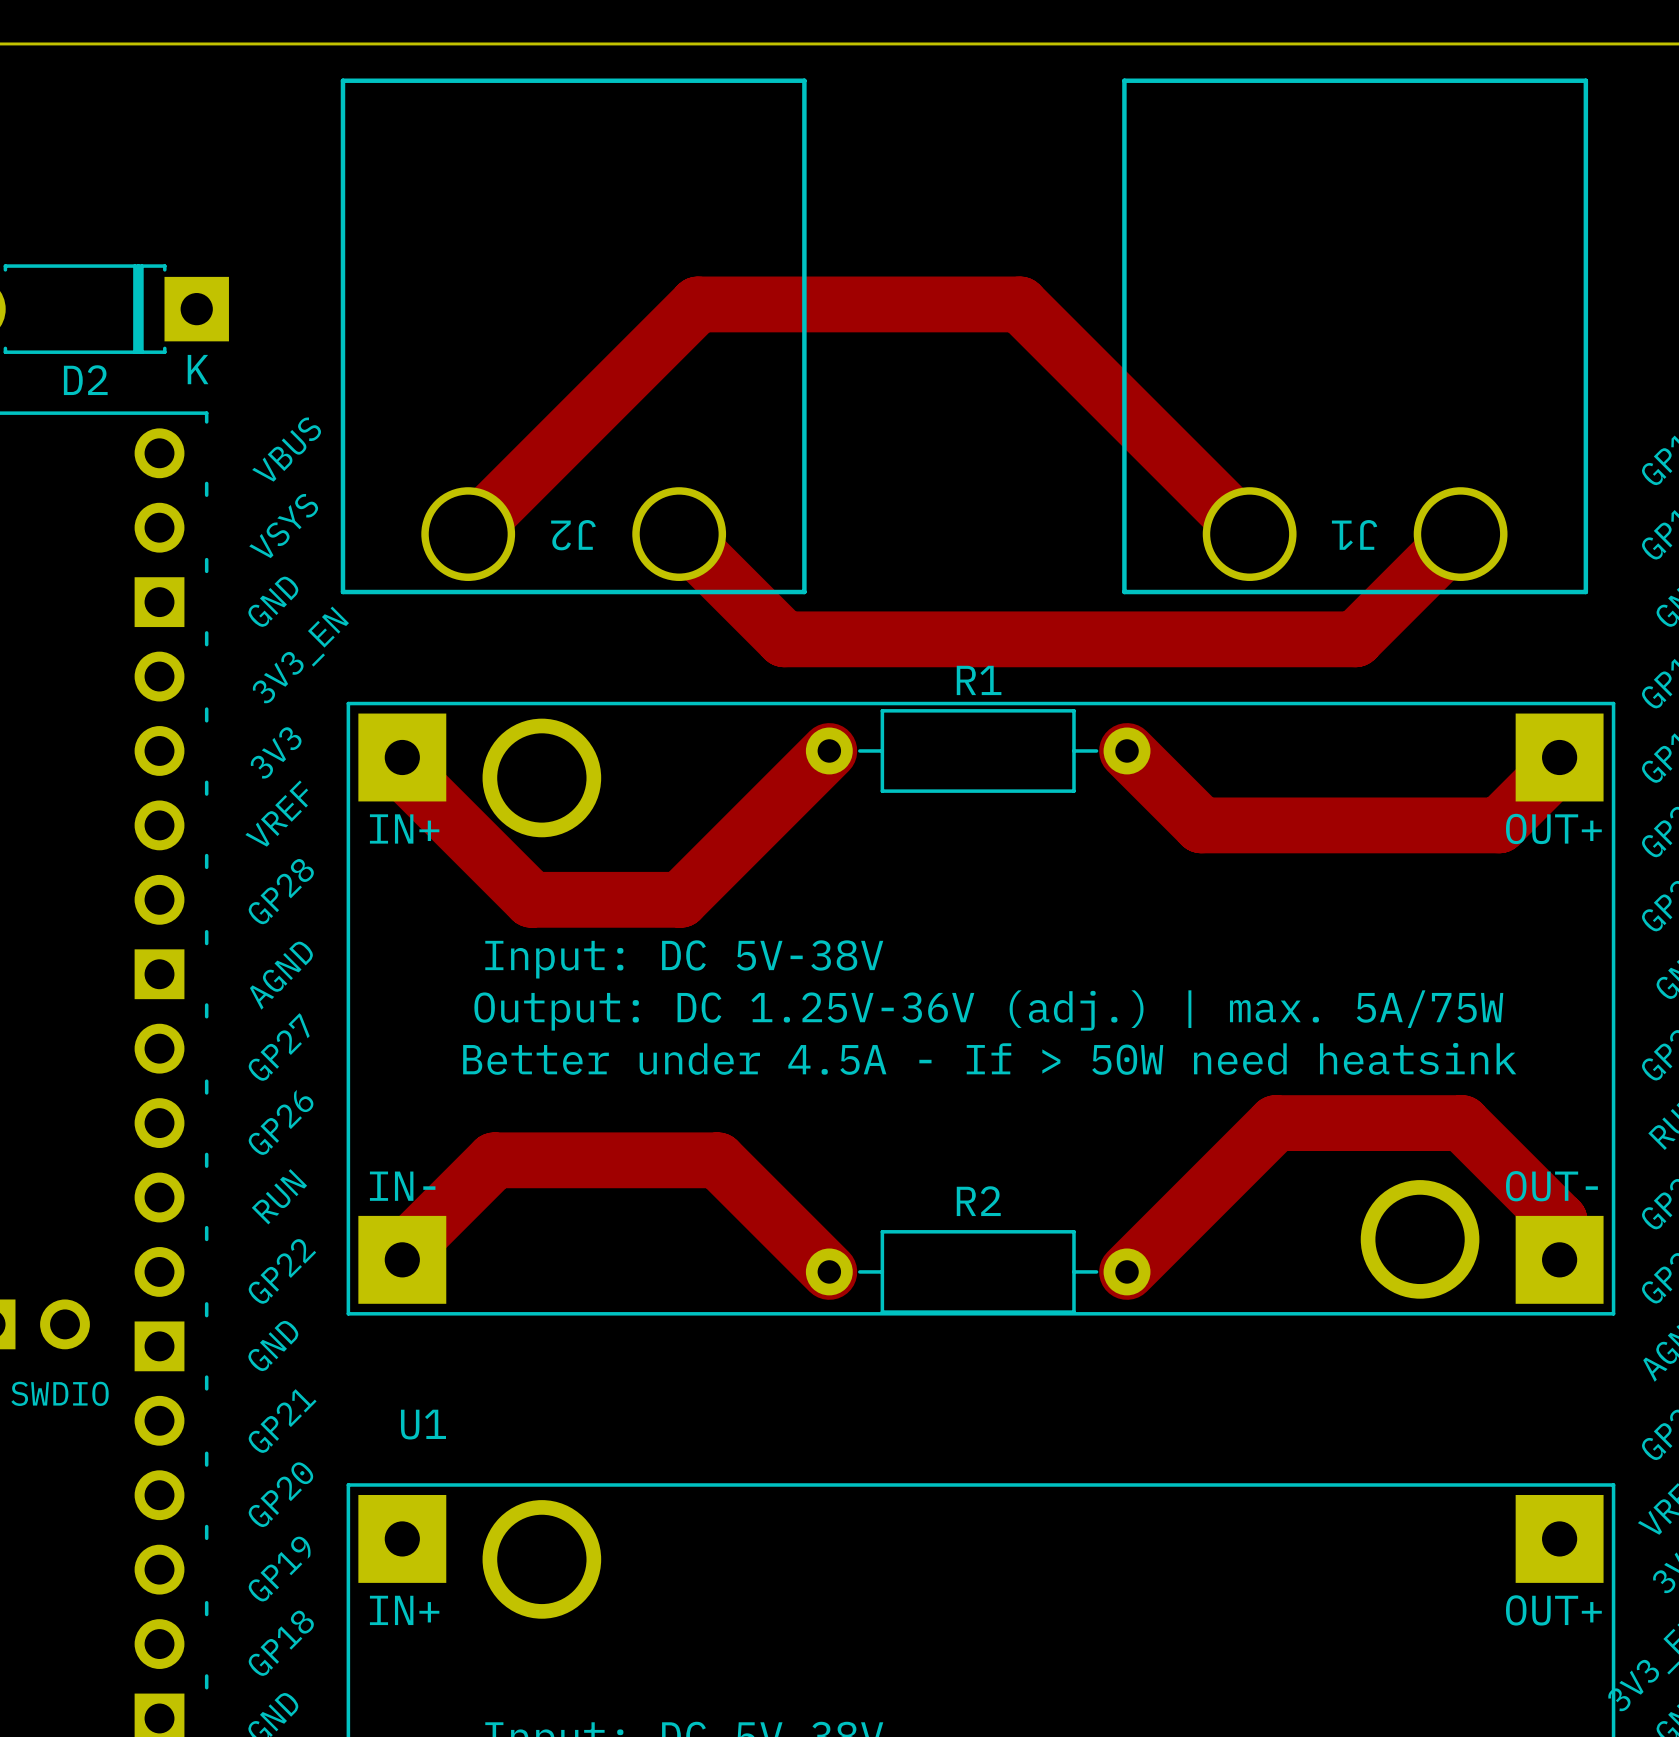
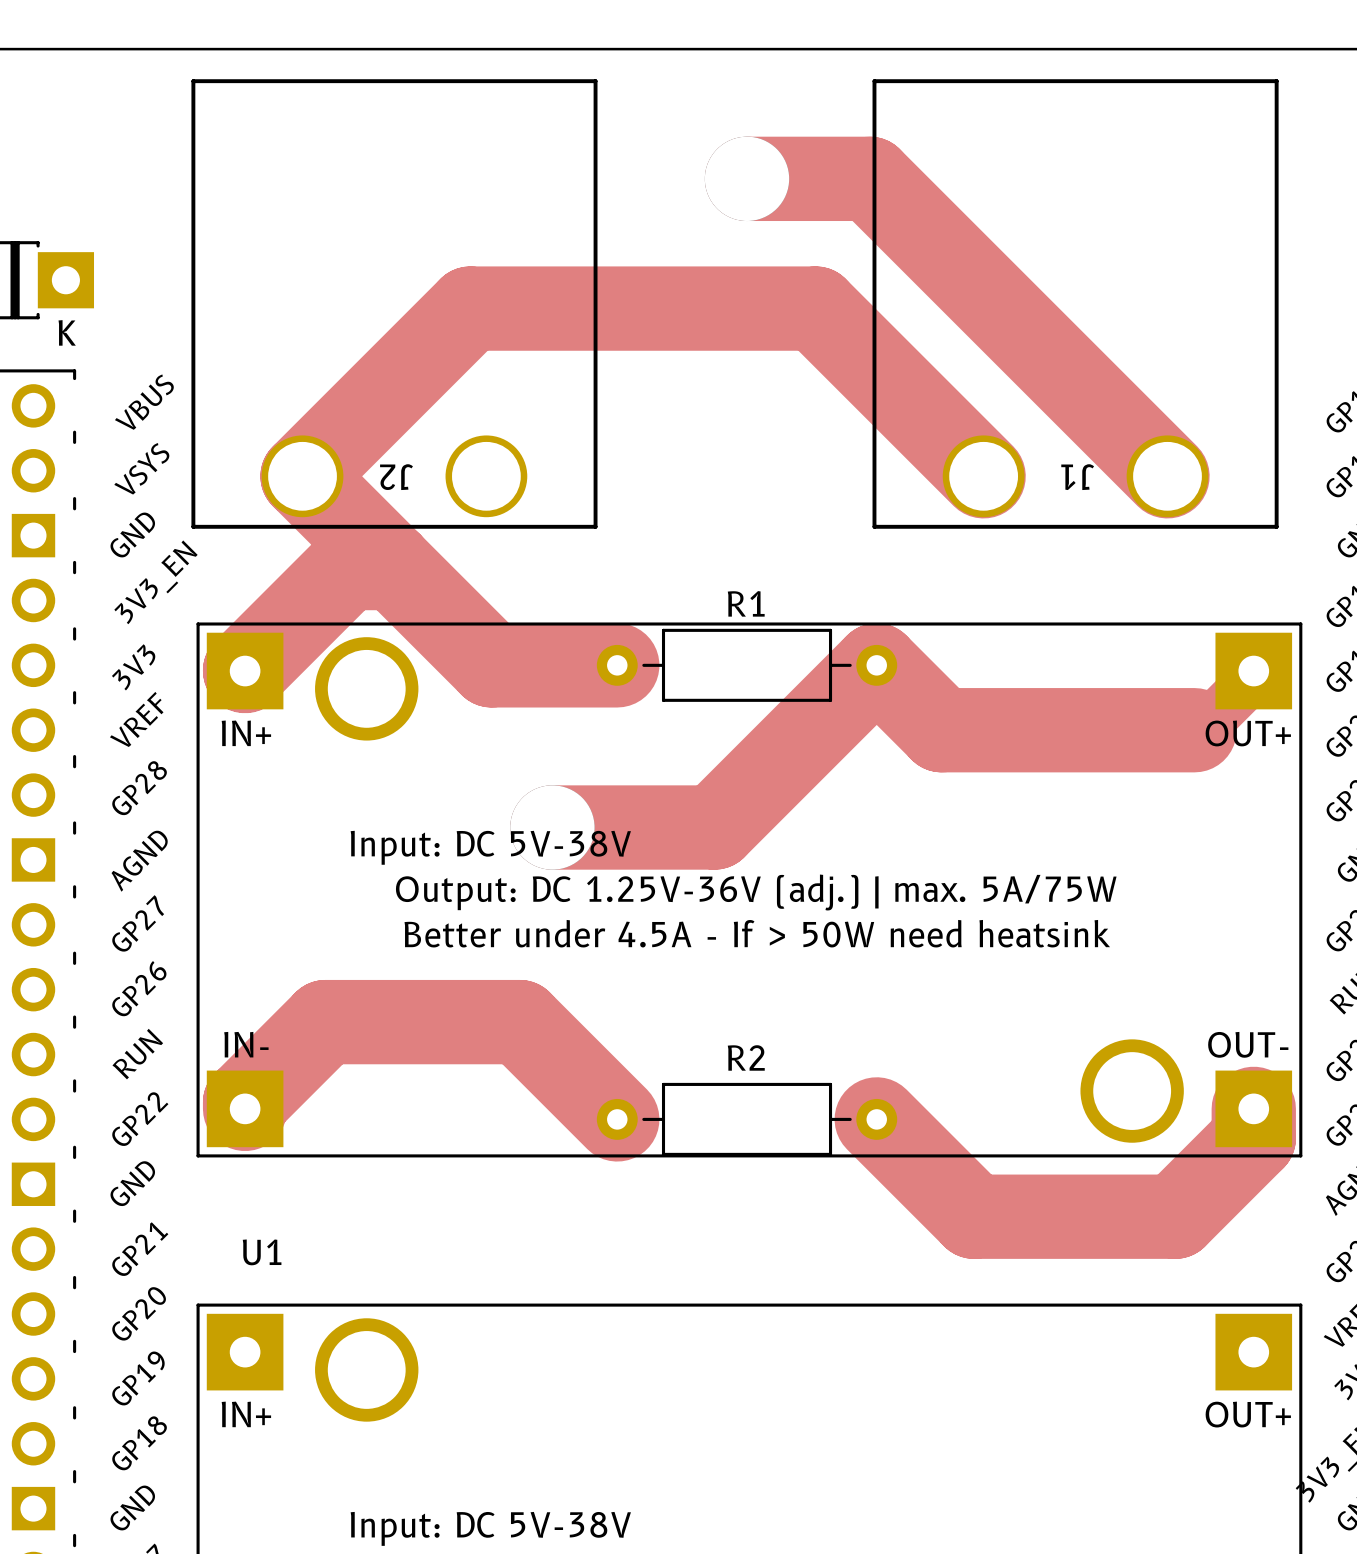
via: none -> (747, 178)
track: (660, 341) (697, 304) (1019, 304) (1057, 341) -> (470, 308) (815, 308)
track width: thin (660, 341) (468, 534) -> thick (470, 308) (302, 476)
track width: thin (1057, 341) (1249, 534) -> thick (815, 308) (983, 476)
track: (679, 534) (784, 639) (1355, 639) (1460, 534) -> (747, 178) (870, 178) (1167, 476)
track: none -> (390, 564) (390, 568) (347, 568) (245, 670)
track: (829, 750) (680, 899) (531, 899) (402, 770) (402, 757) -> (617, 665) (491, 665) (302, 476)
track: none -> (876, 665) (714, 827) (552, 827)
track width: thin (1127, 750) (1201, 825) (1491, 825) -> thick (876, 665) (941, 730) (1194, 730)
via: none -> (552, 827)
track width: thin (402, 1259) (402, 1252) (494, 1160) (717, 1160) (829, 1271) -> thick (245, 1108) (245, 1102) (325, 1022) (519, 1022) (617, 1119)
track: (1559, 1259) (1559, 1220) (1461, 1123) (1275, 1123) (1127, 1271) -> (1253, 1108) (1253, 1138) (1175, 1216) (974, 1216) (876, 1119)

